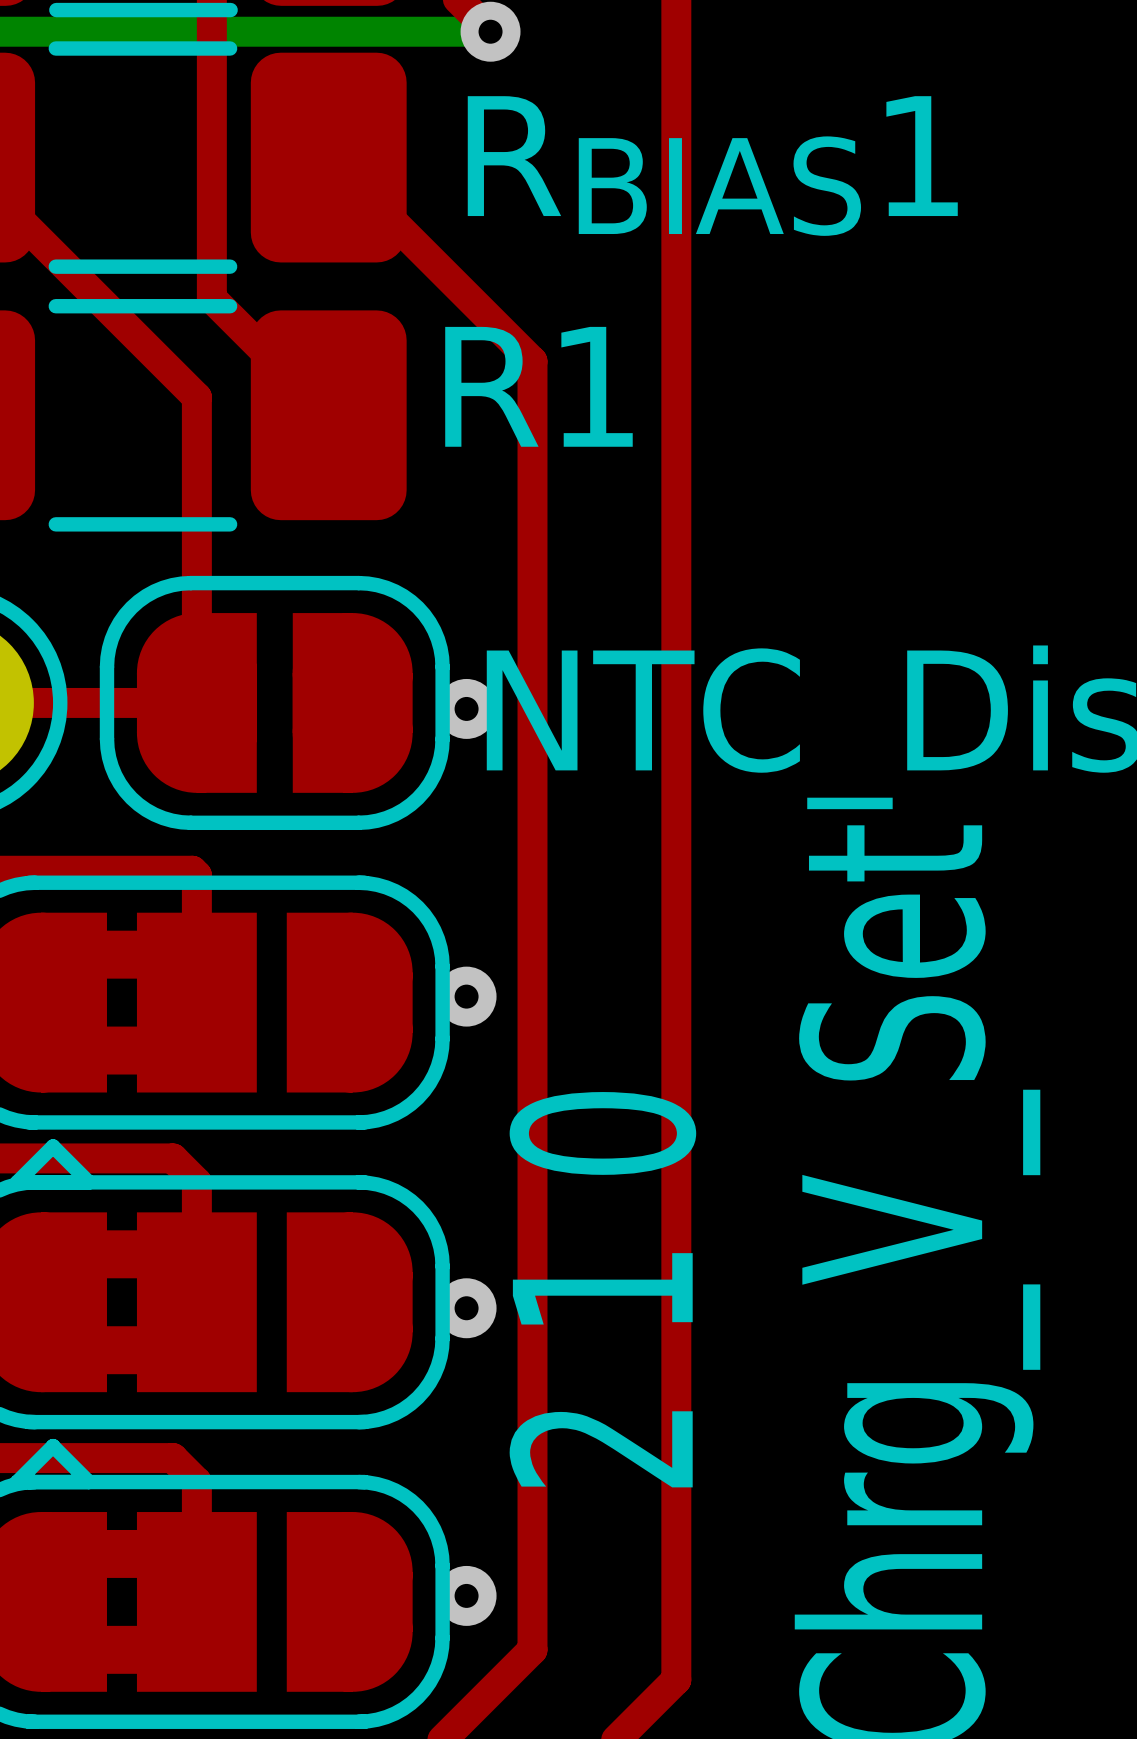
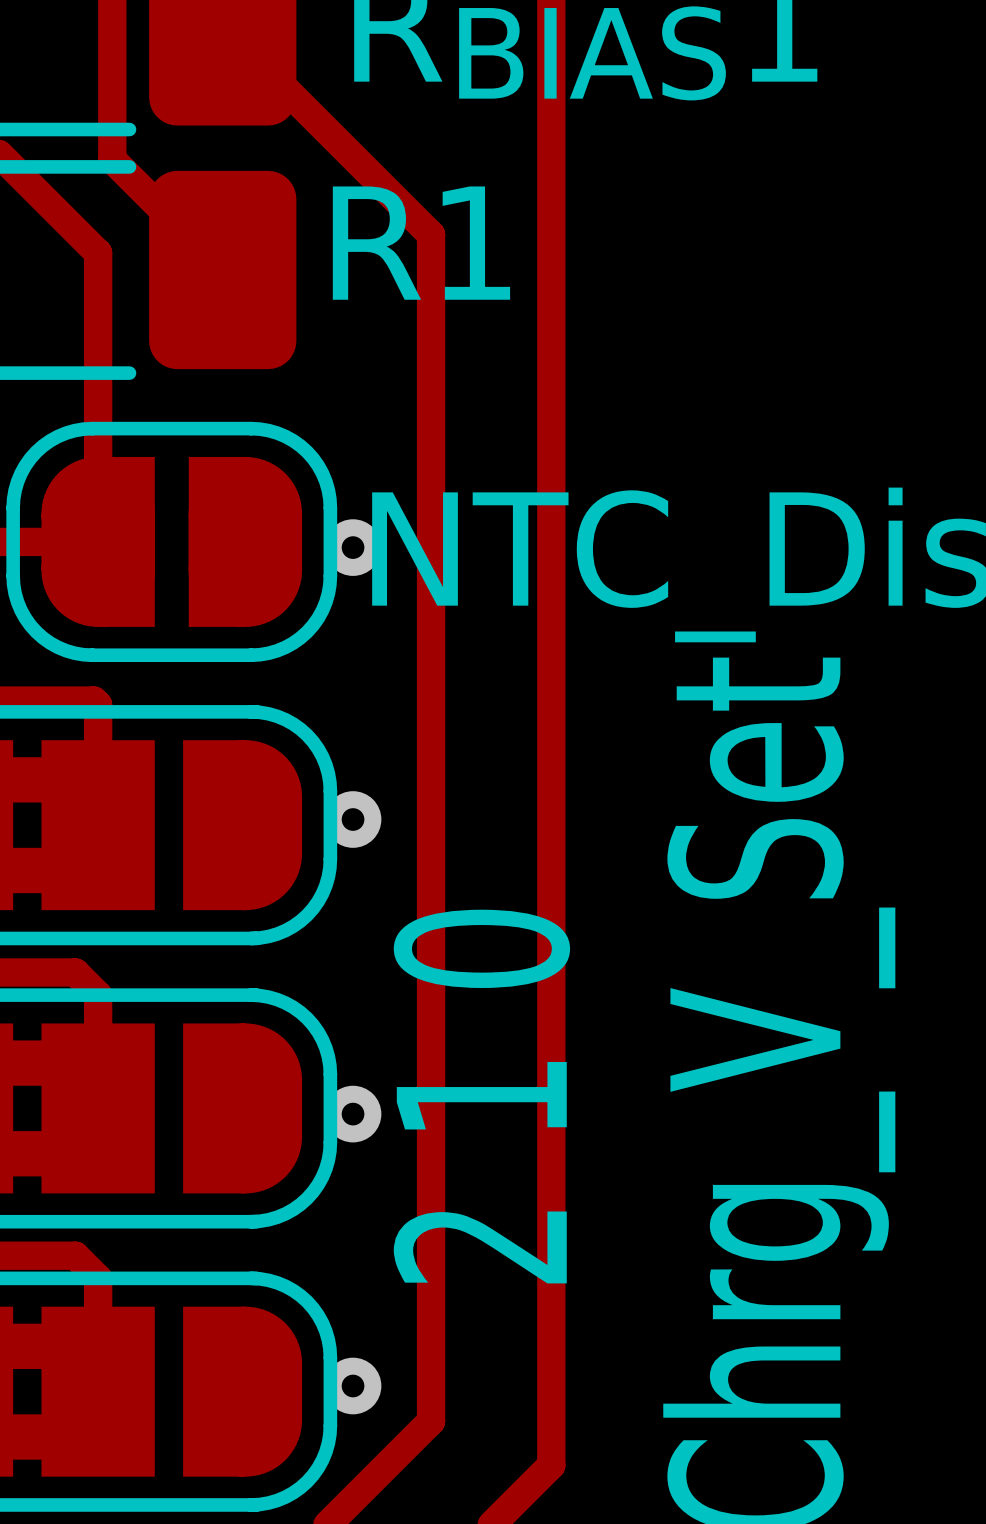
top track: (532, 361) (532, 1649) -> (415, 219) (431, 234) (431, 1421) (415, 1436)

